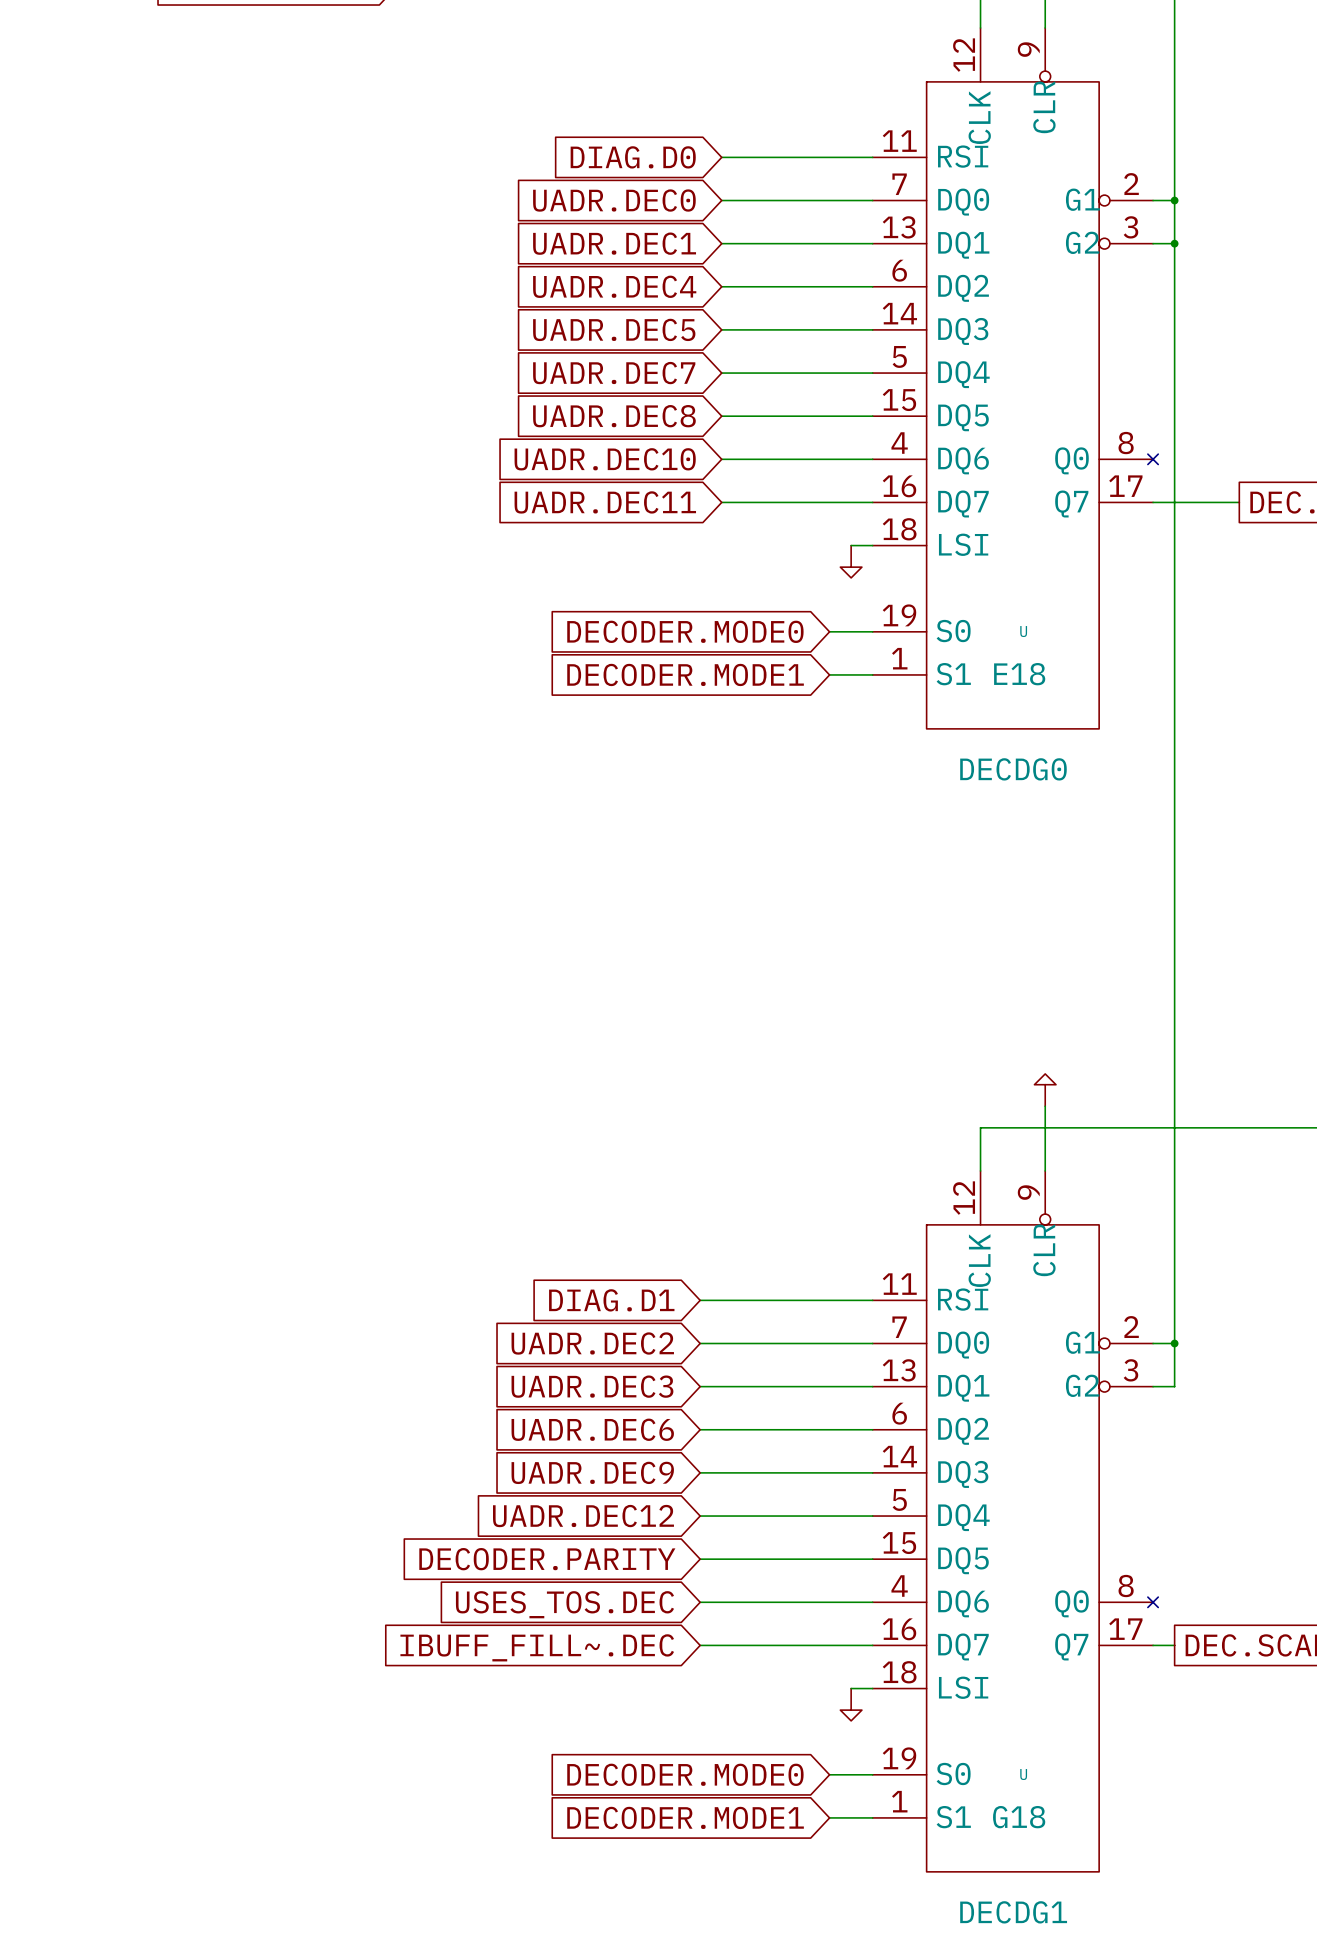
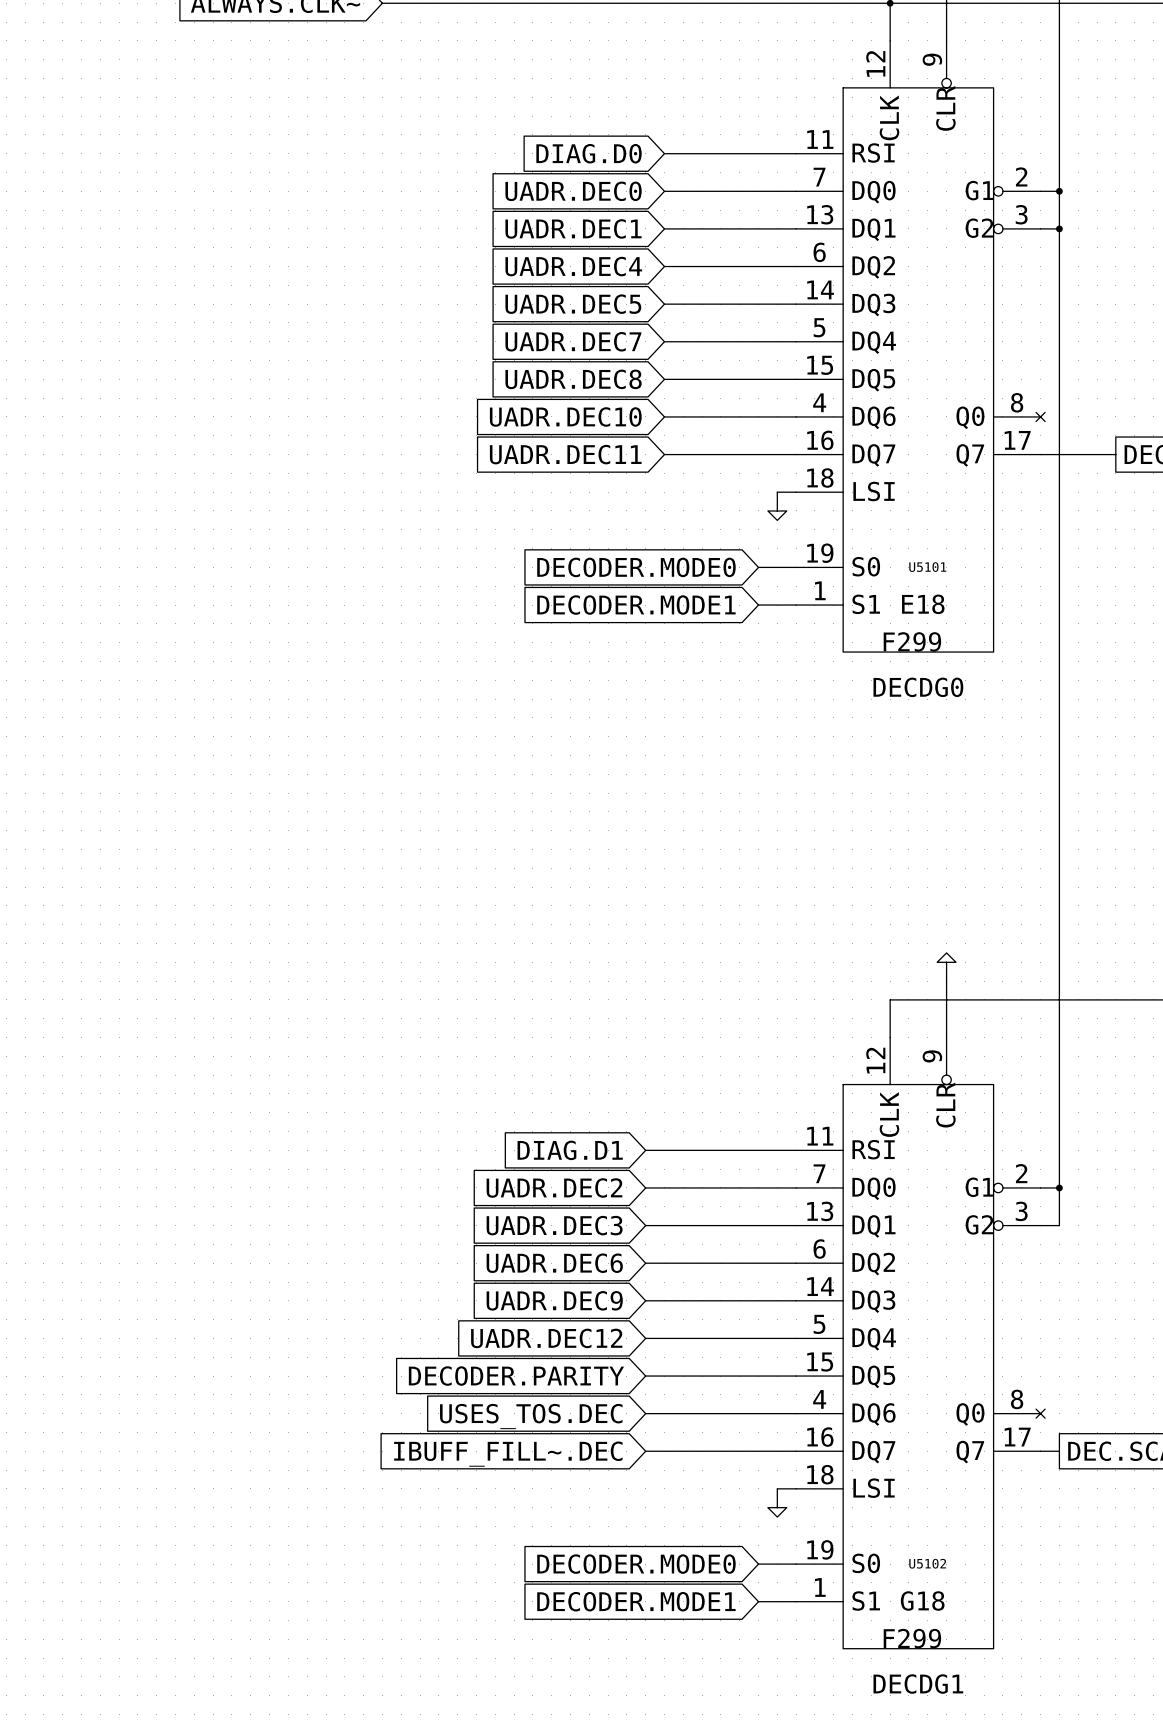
U name: U (1023, 631) -> U5101 (927, 567)
U value: none -> F299 (912, 641)
U name: U (1023, 1774) -> U5102 (927, 1563)
U value: none -> F299 (912, 1638)

